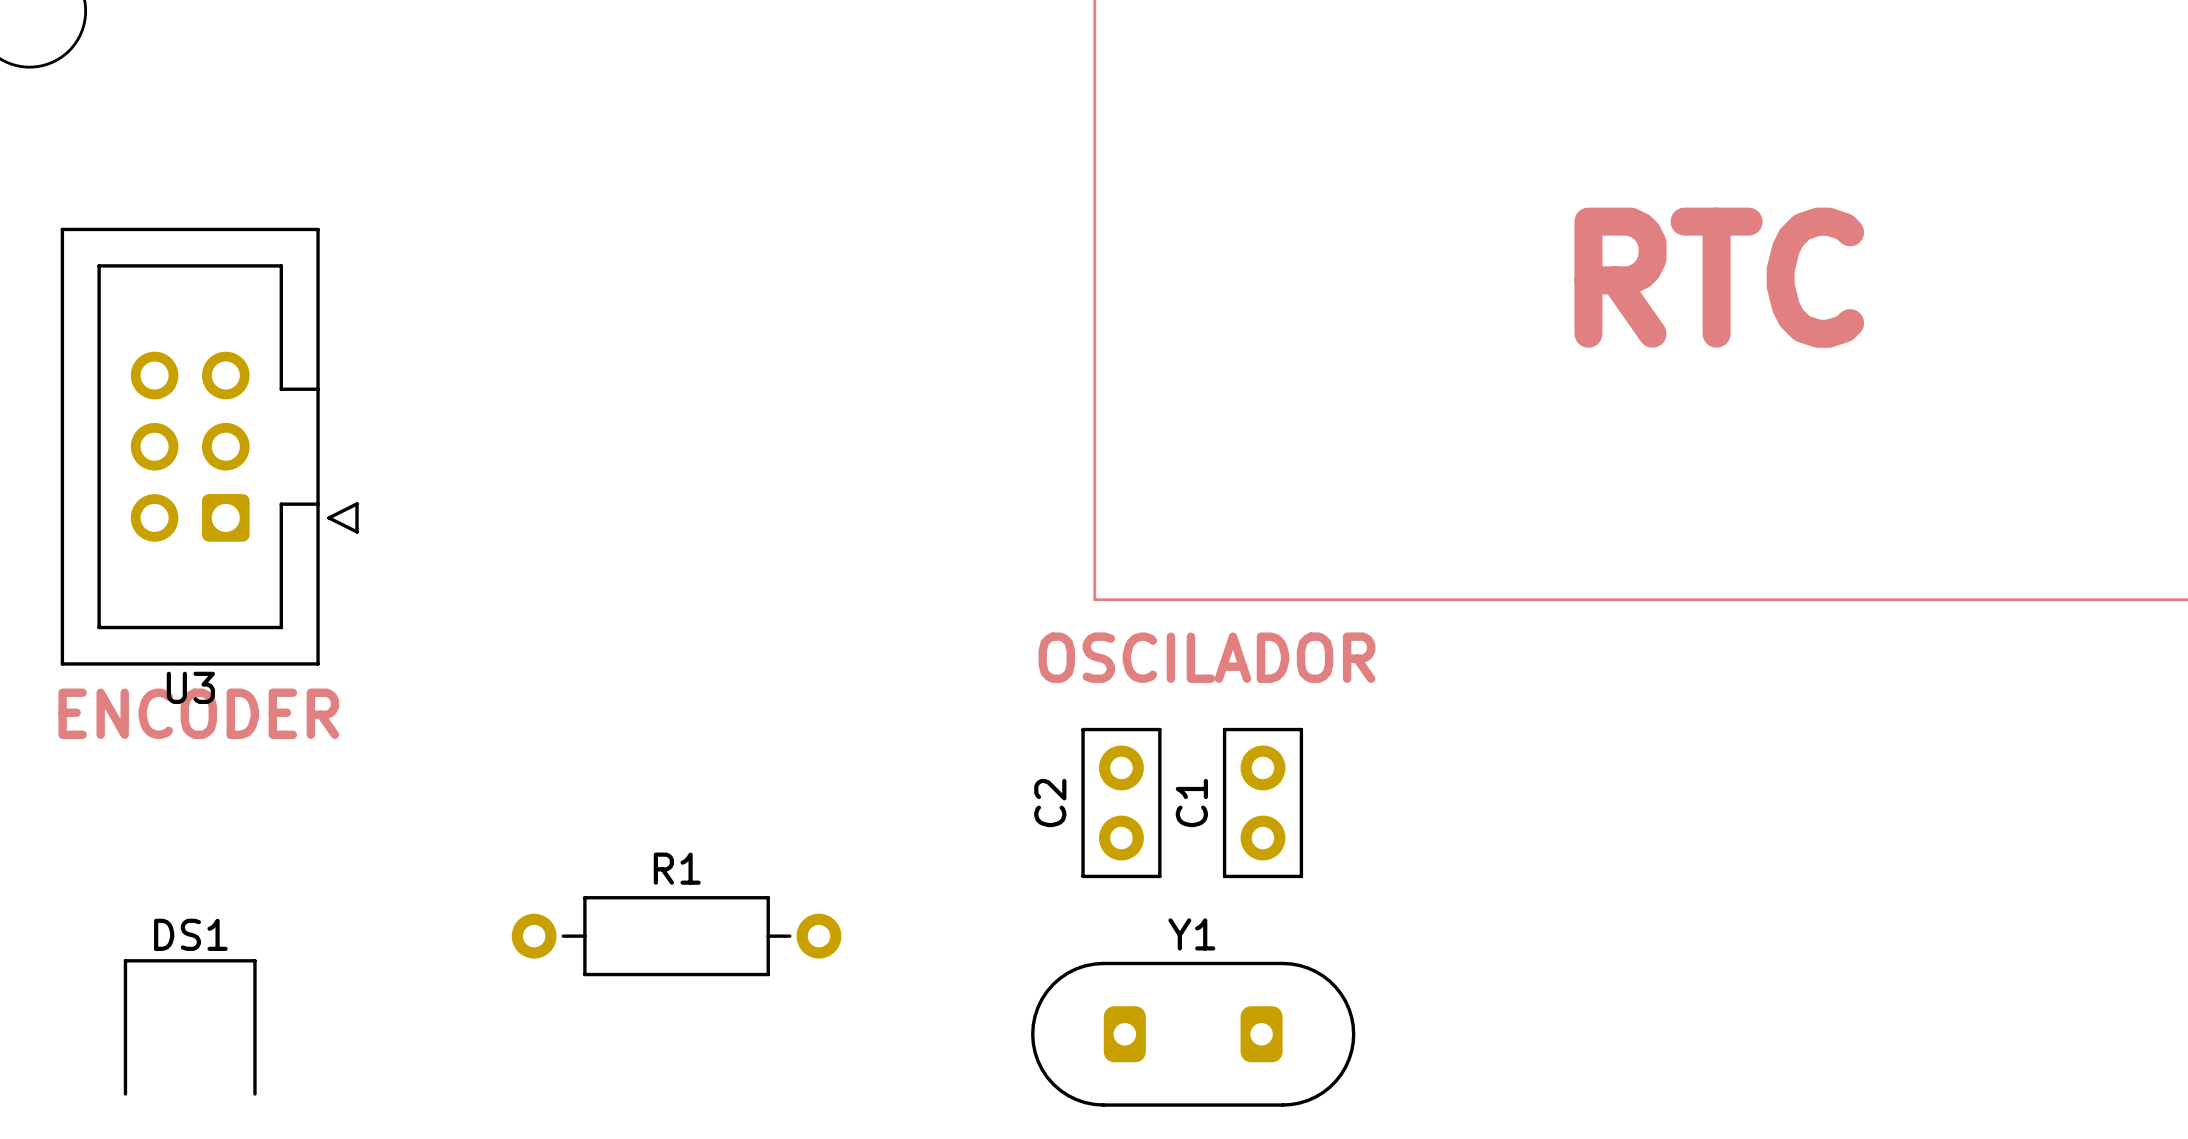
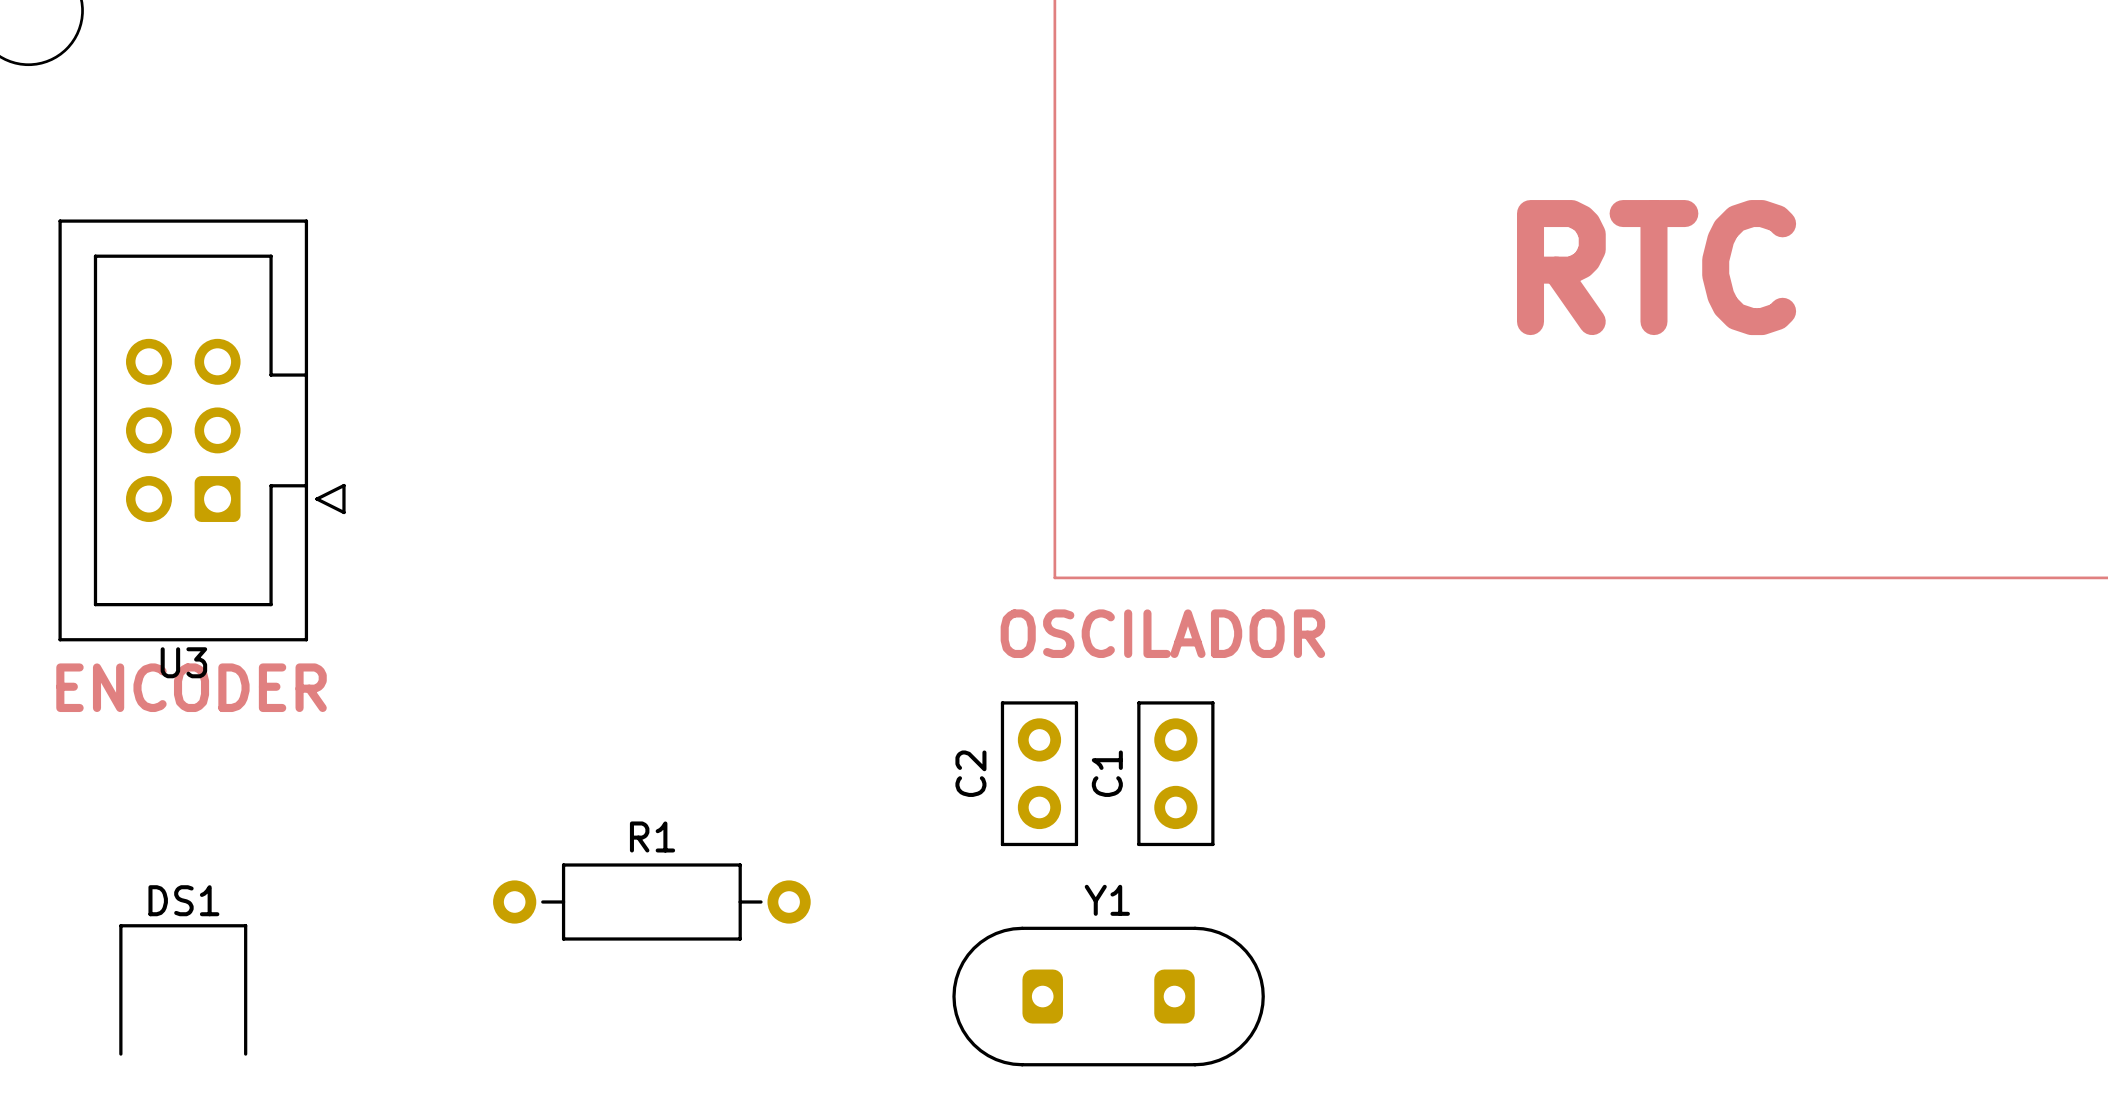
C2 position: (1121, 803) -> (1039, 773)
C1 position: (1262, 803) -> (1175, 773)
Y1 position: (1193, 1034) -> (1108, 996)

